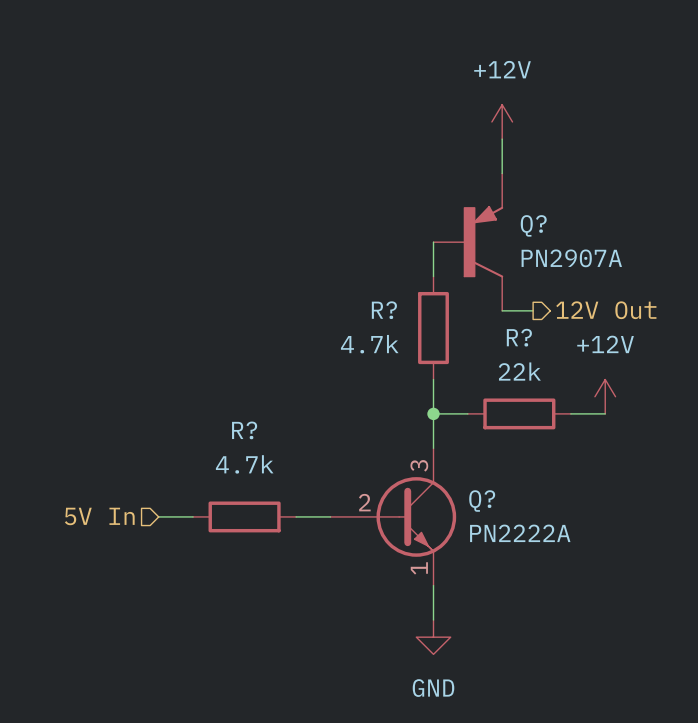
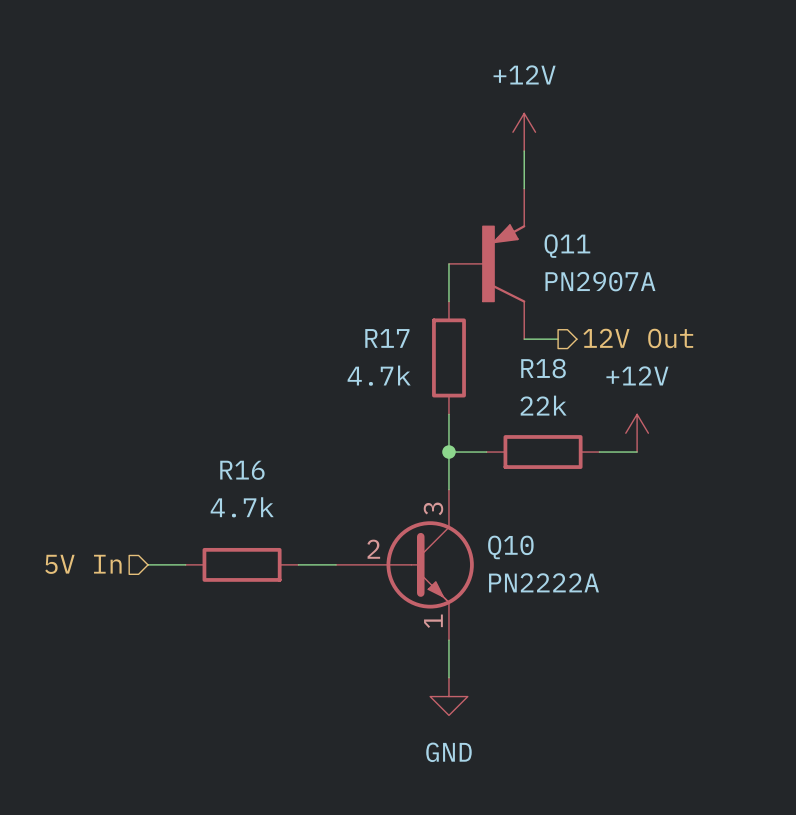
Q? name: Q? (533, 225) -> Q11 (567, 246)
R? name: R? (384, 310) -> R17 (387, 338)
R? name: R? (519, 337) -> R18 (543, 368)
R? name: R? (244, 430) -> R16 (242, 470)
Q? name: Q? (482, 501) -> Q10 (510, 547)

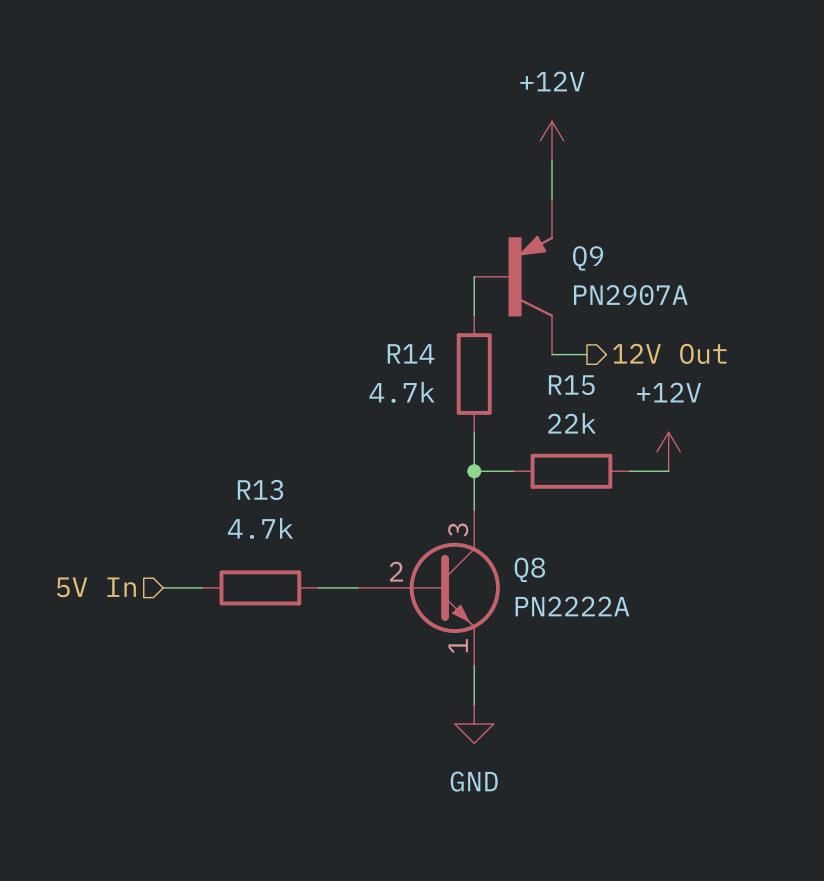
Q11 name: Q11 (567, 246) -> Q9 (588, 258)
R17 name: R17 (387, 338) -> R14 (411, 353)
R18 name: R18 (543, 368) -> R15 (571, 385)
R16 name: R16 (242, 470) -> R13 (260, 489)
Q10 name: Q10 (510, 547) -> Q8 (529, 569)

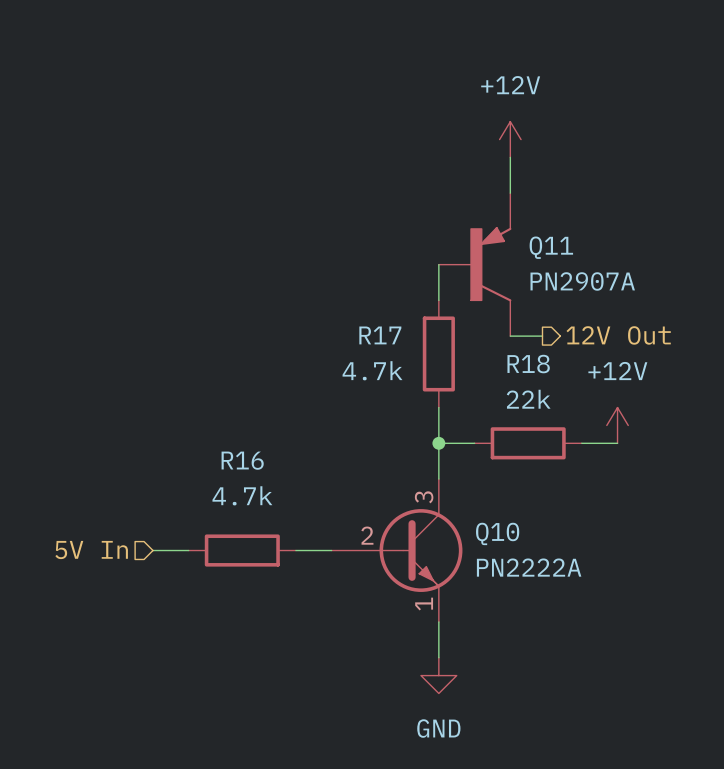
Q9 name: Q9 (588, 258) -> Q11 (551, 247)
R14 name: R14 (411, 353) -> R17 (380, 335)
R15 name: R15 (571, 385) -> R18 (528, 364)
R13 name: R13 (260, 489) -> R16 (242, 460)
Q8 name: Q8 (529, 569) -> Q10 (497, 533)

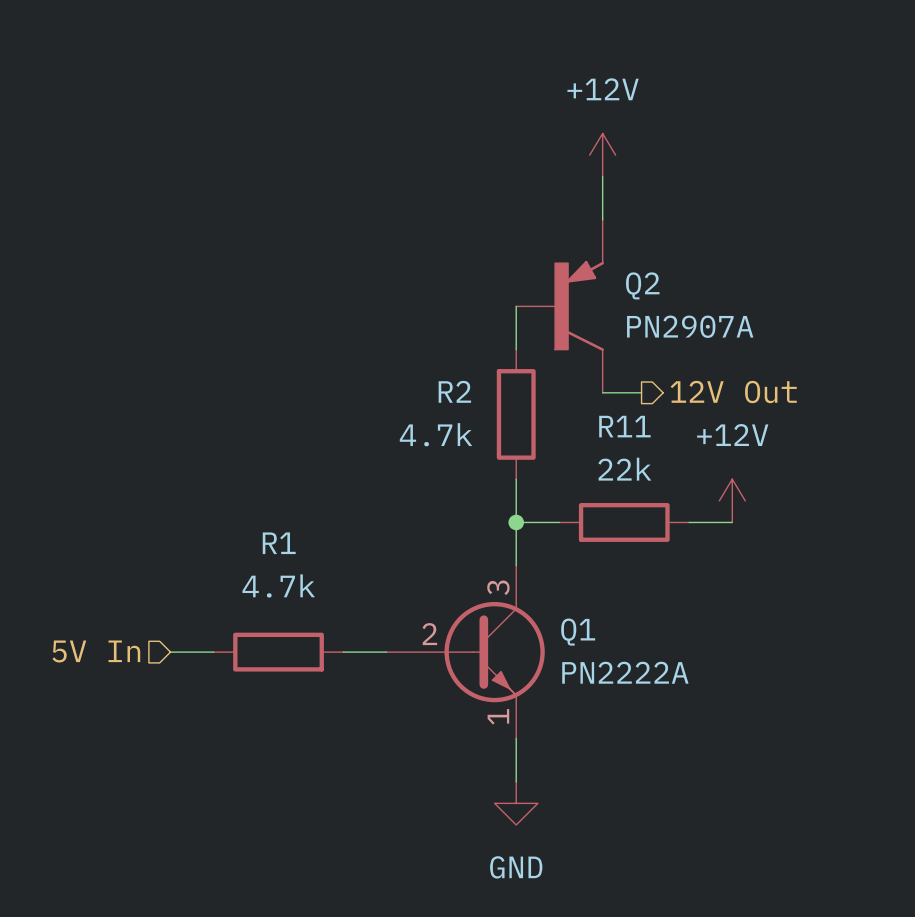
Q11 name: Q11 (551, 247) -> Q2 (642, 285)
R17 name: R17 (380, 335) -> R2 (454, 391)
R18 name: R18 (528, 364) -> R11 (624, 426)
R16 name: R16 (242, 460) -> R1 (279, 543)
Q10 name: Q10 (497, 533) -> Q1 (578, 632)

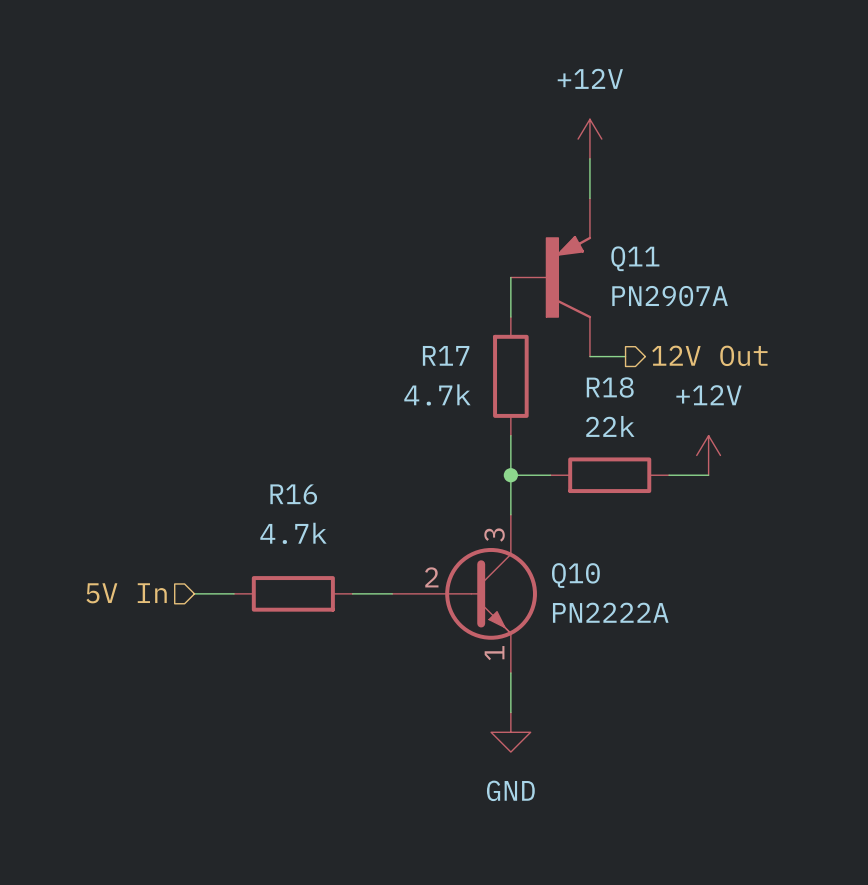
Q2 name: Q2 (642, 285) -> Q11 (635, 258)
R2 name: R2 (454, 391) -> R17 (446, 355)
R11 name: R11 (624, 426) -> R18 (610, 387)
R1 name: R1 (279, 543) -> R16 (293, 494)
Q1 name: Q1 (578, 632) -> Q10 (575, 575)

